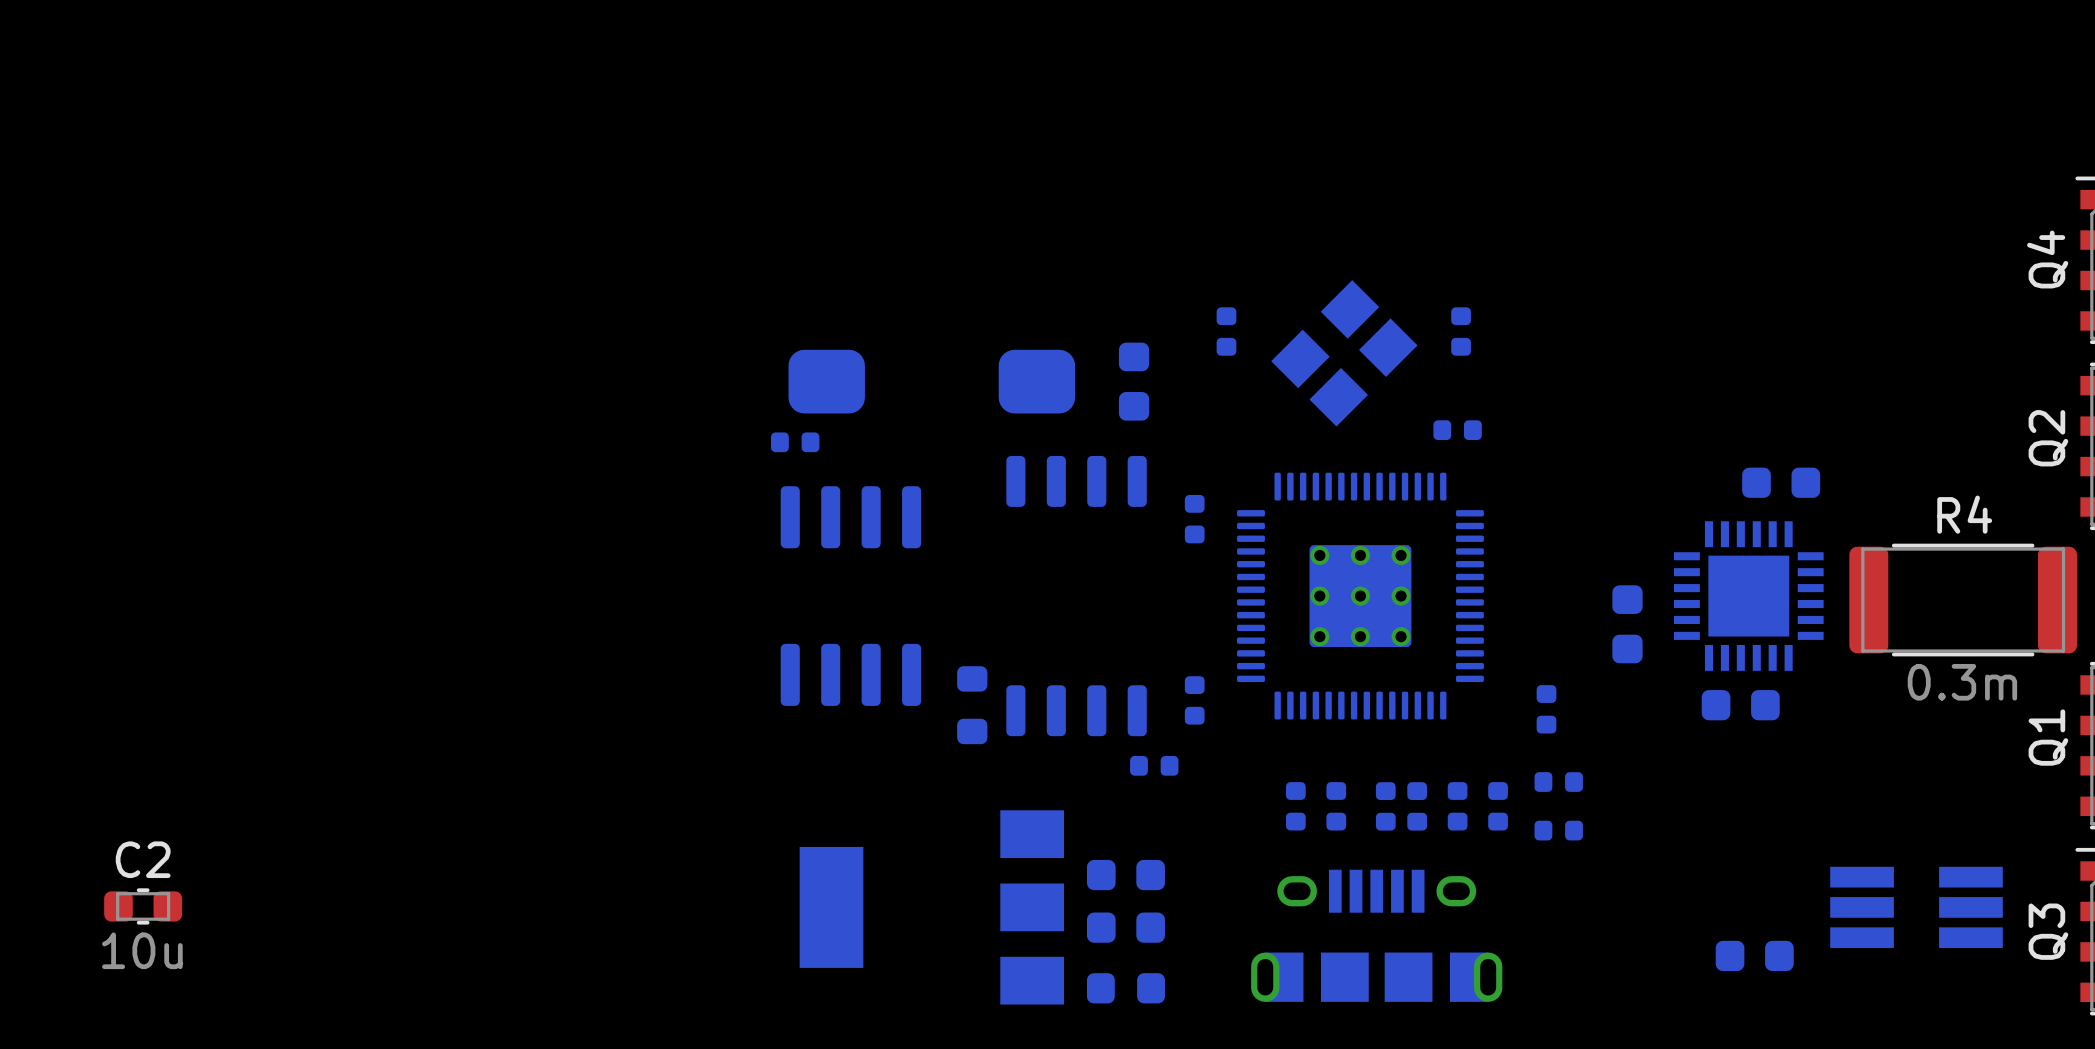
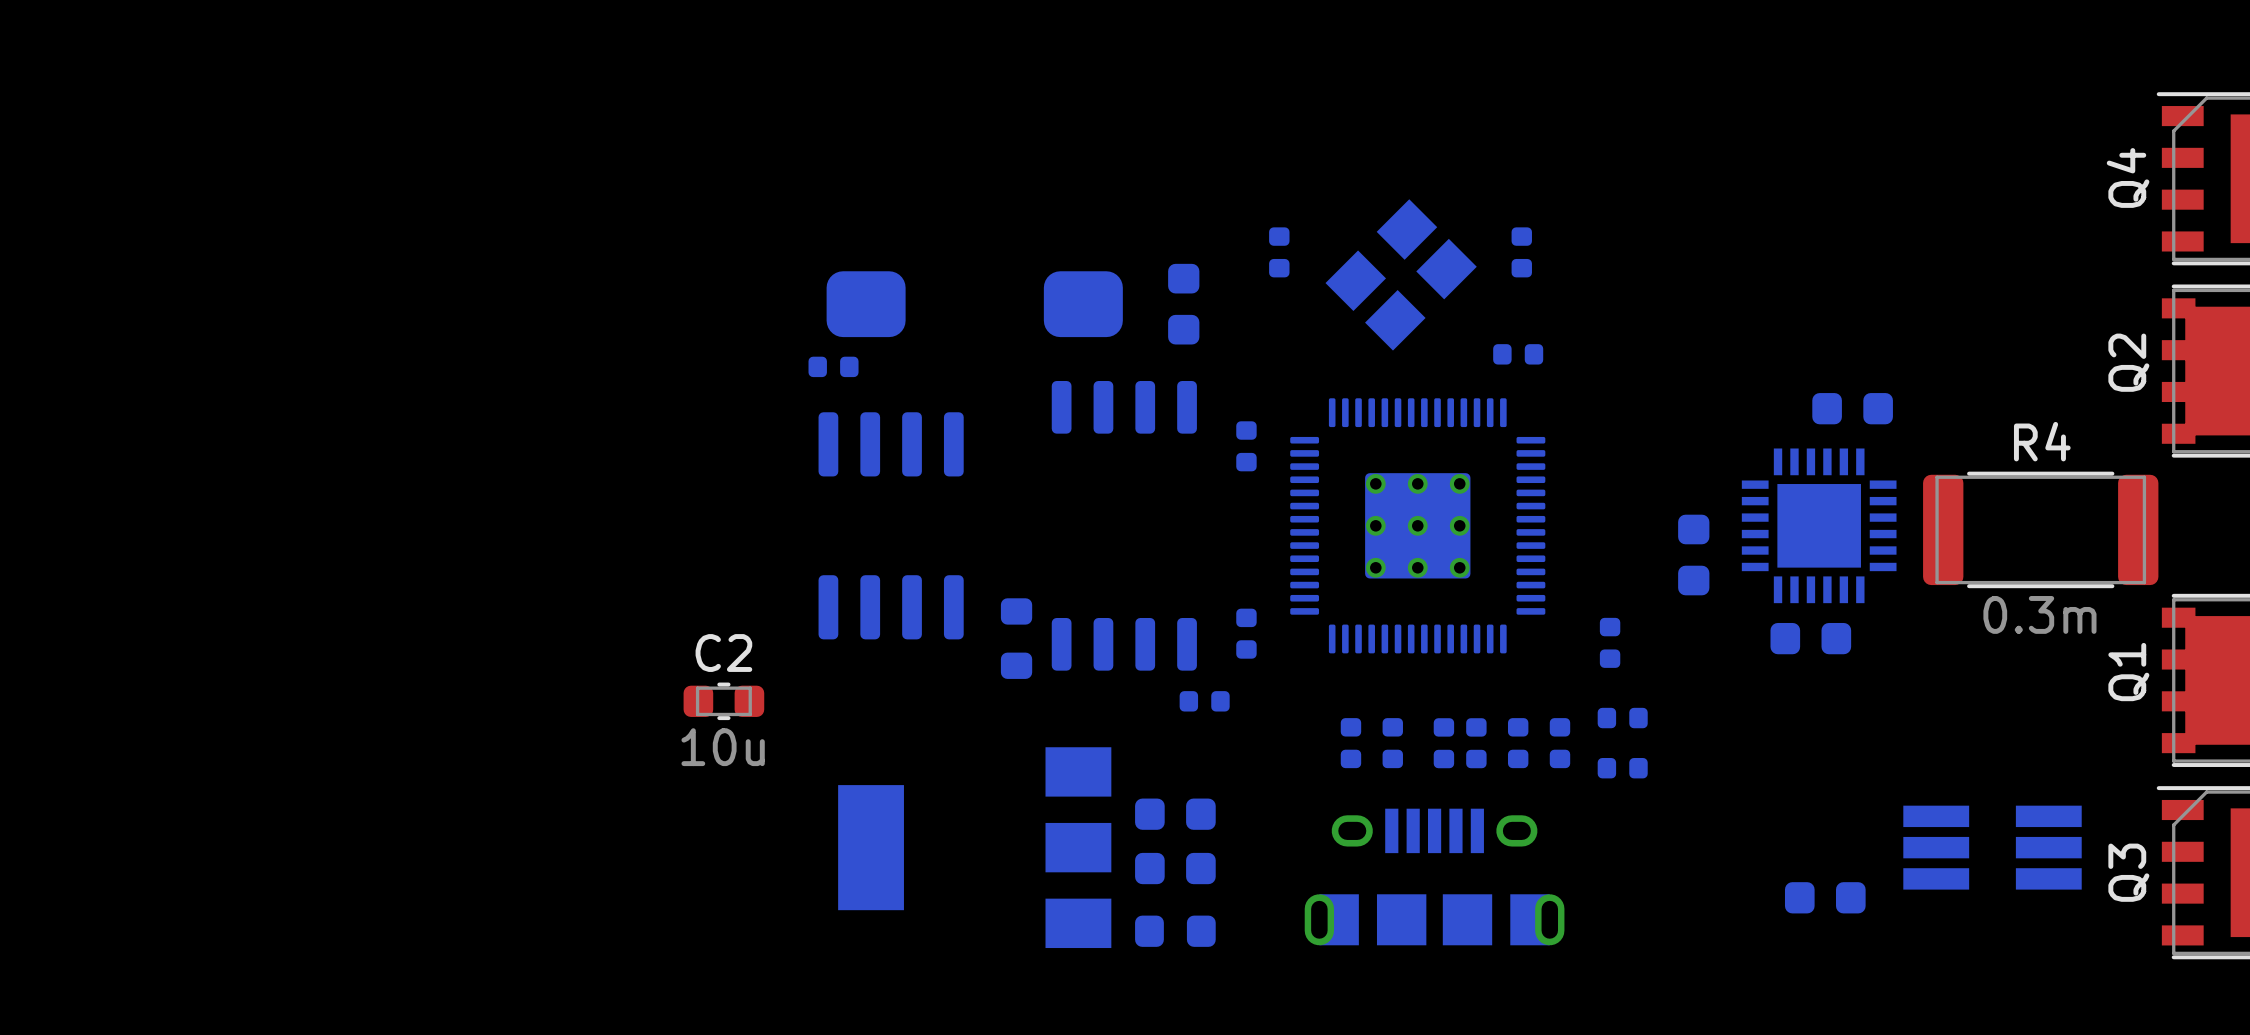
C2 position: (143, 906) -> (723, 701)

